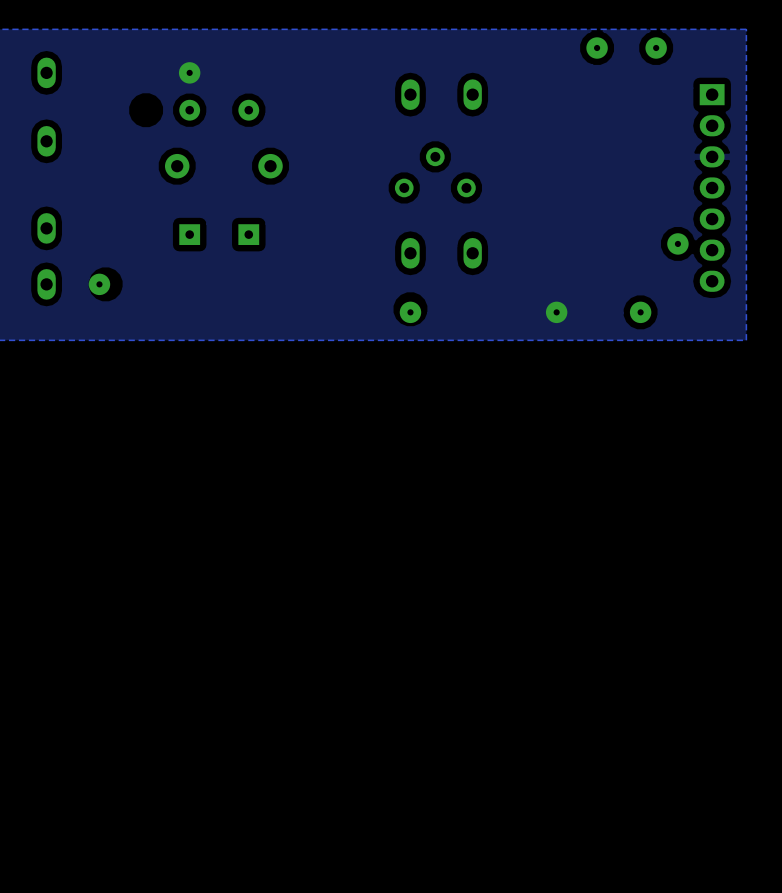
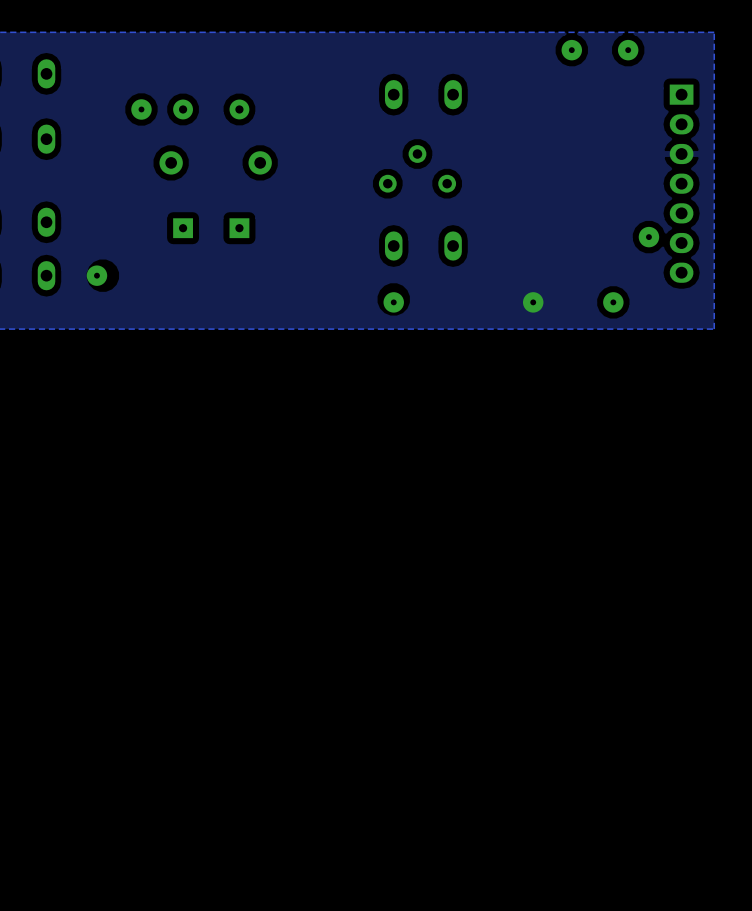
via position: (189, 72) -> (141, 109)

